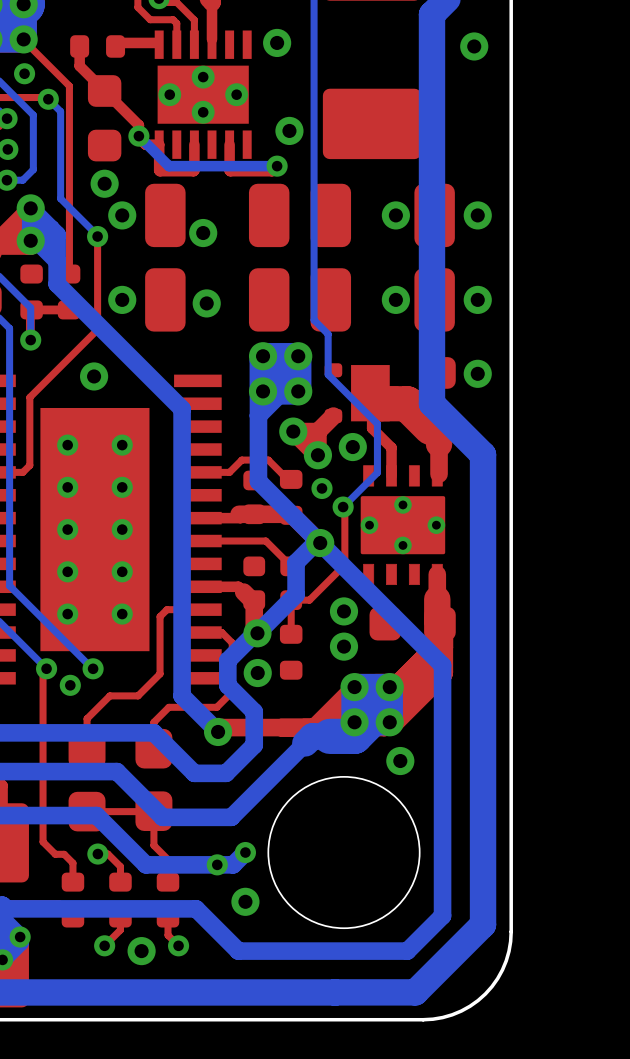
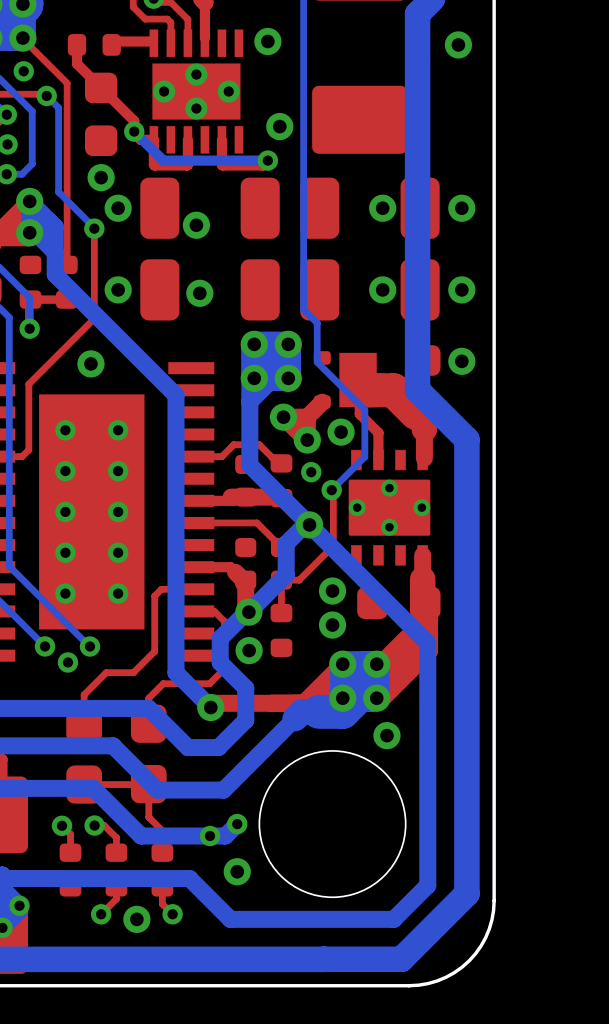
top track: (46, 668) (43, 672) (43, 841) (55, 854) (64, 854) -> none
via: none -> (62, 825)

